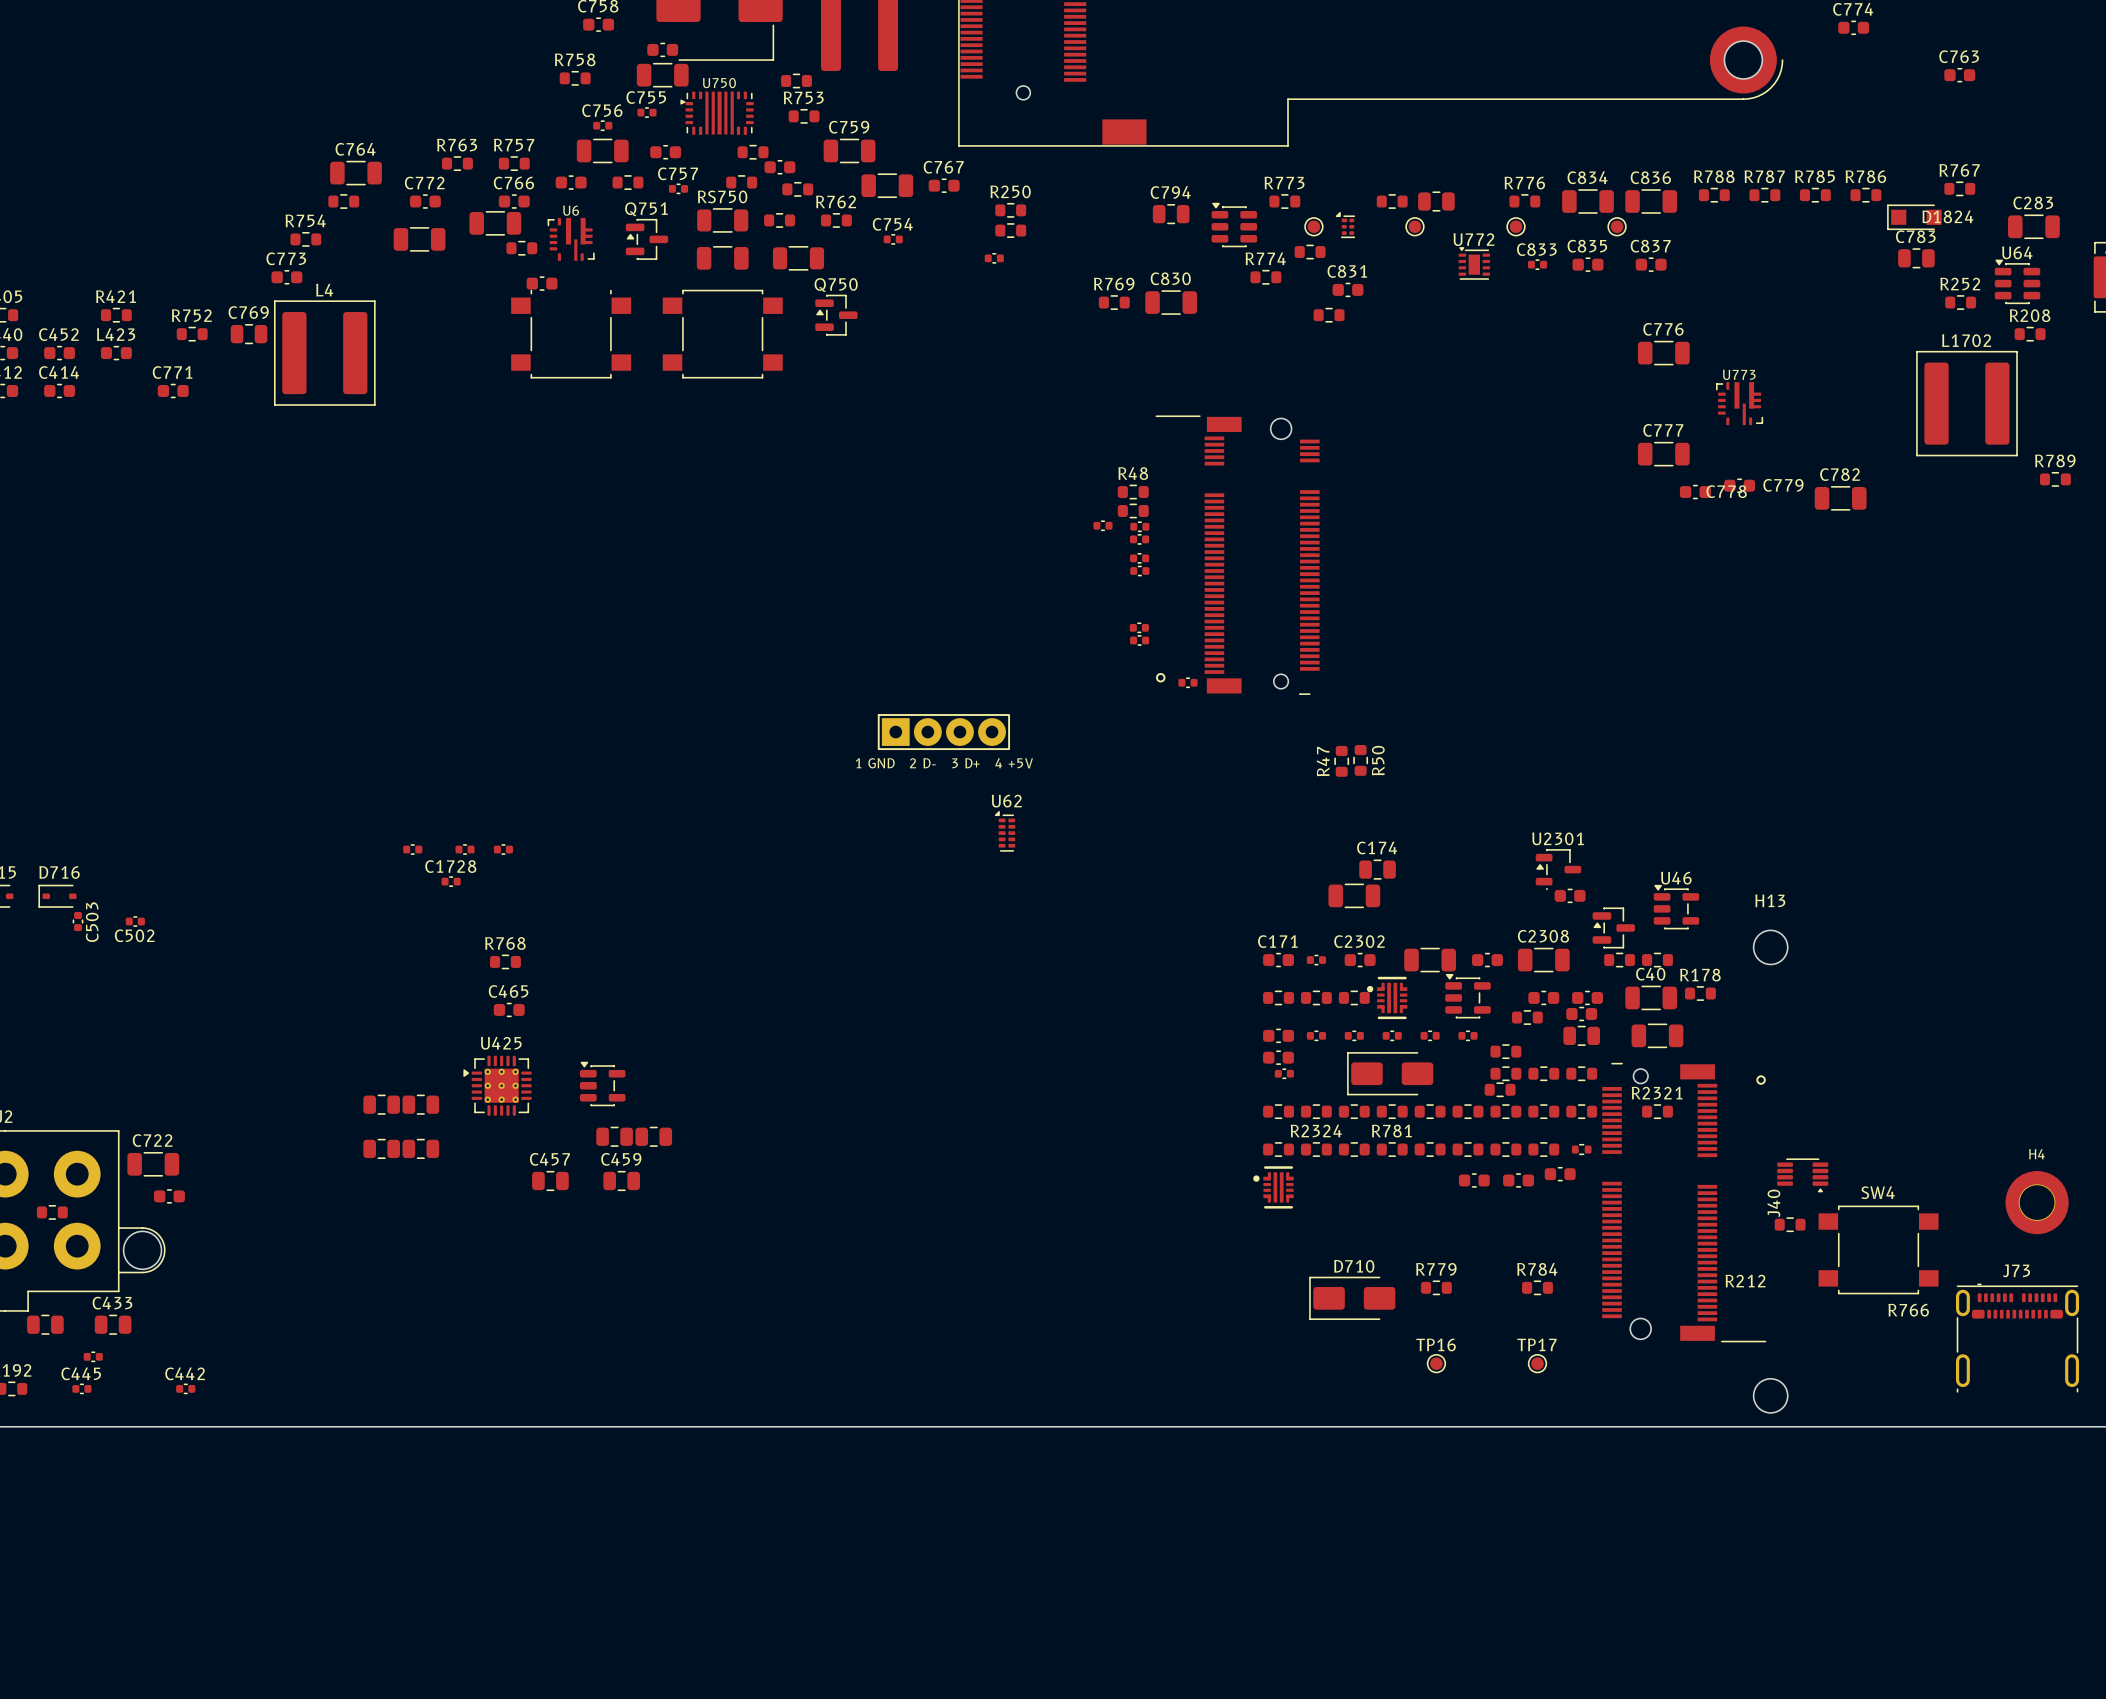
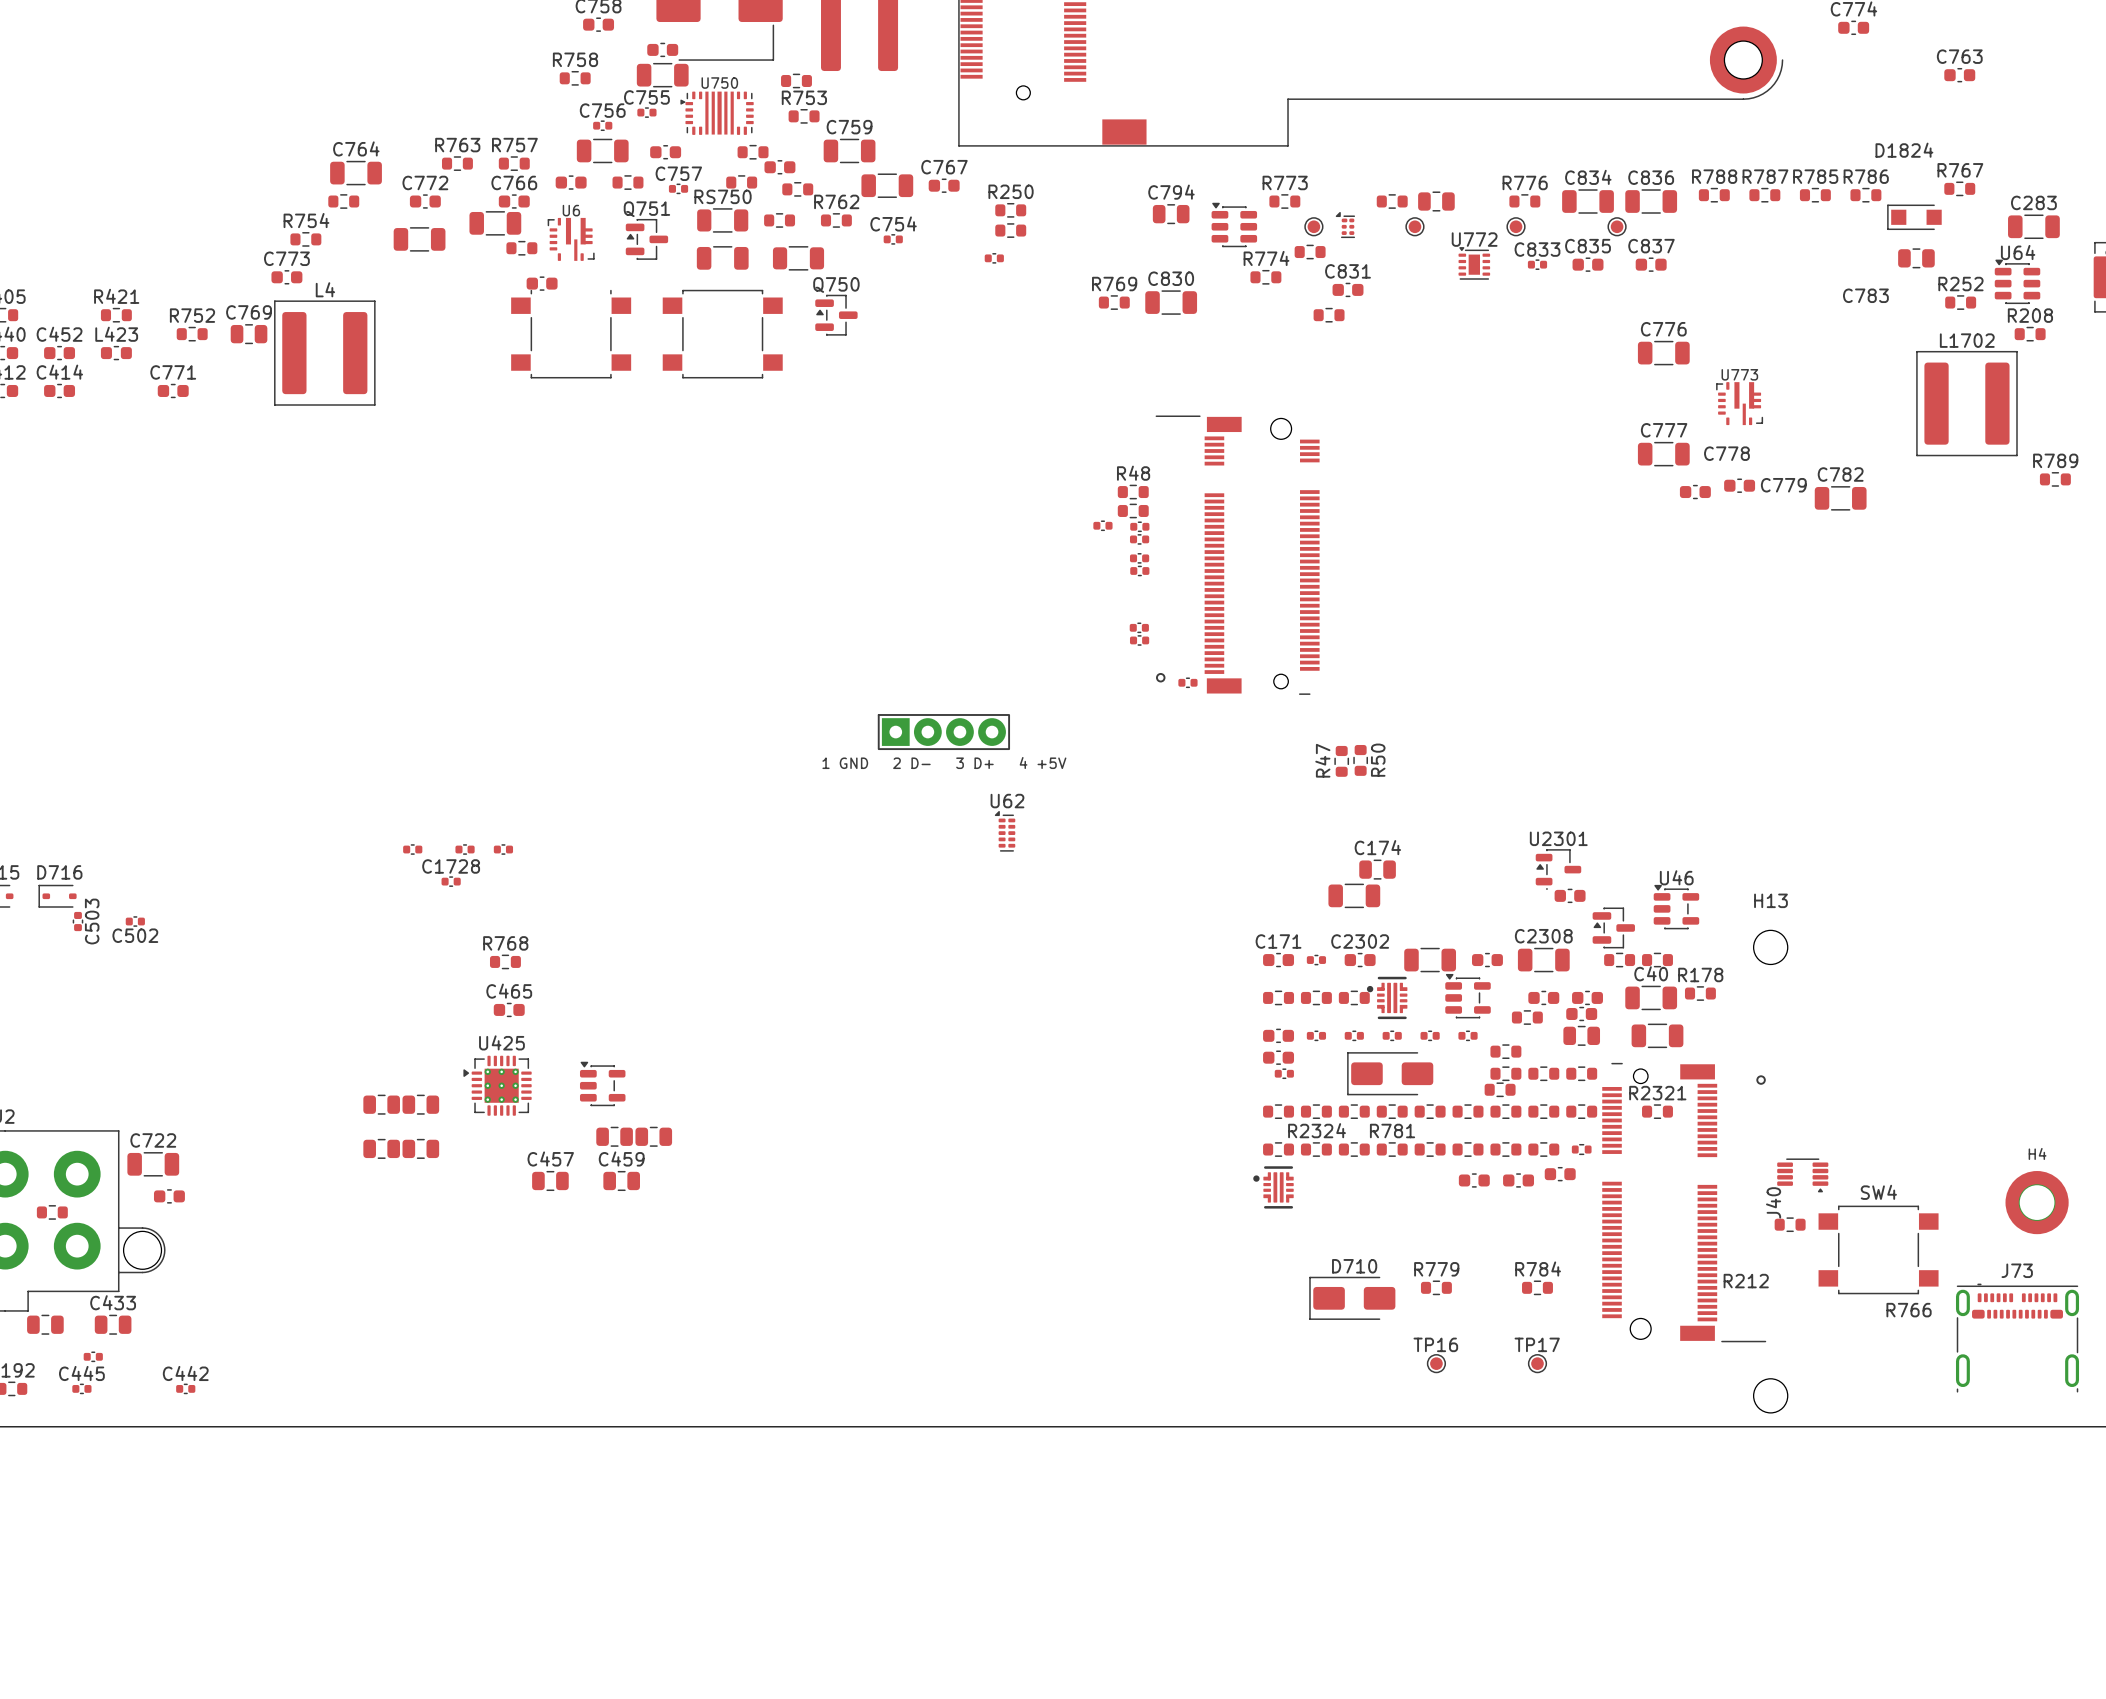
D1824 name position: D1824 (1947, 216) -> D1824 (1904, 150)
C783 name position: C783 (1915, 236) -> C783 (1865, 295)
C778 name position: C778 (1726, 491) -> C778 (1726, 453)

